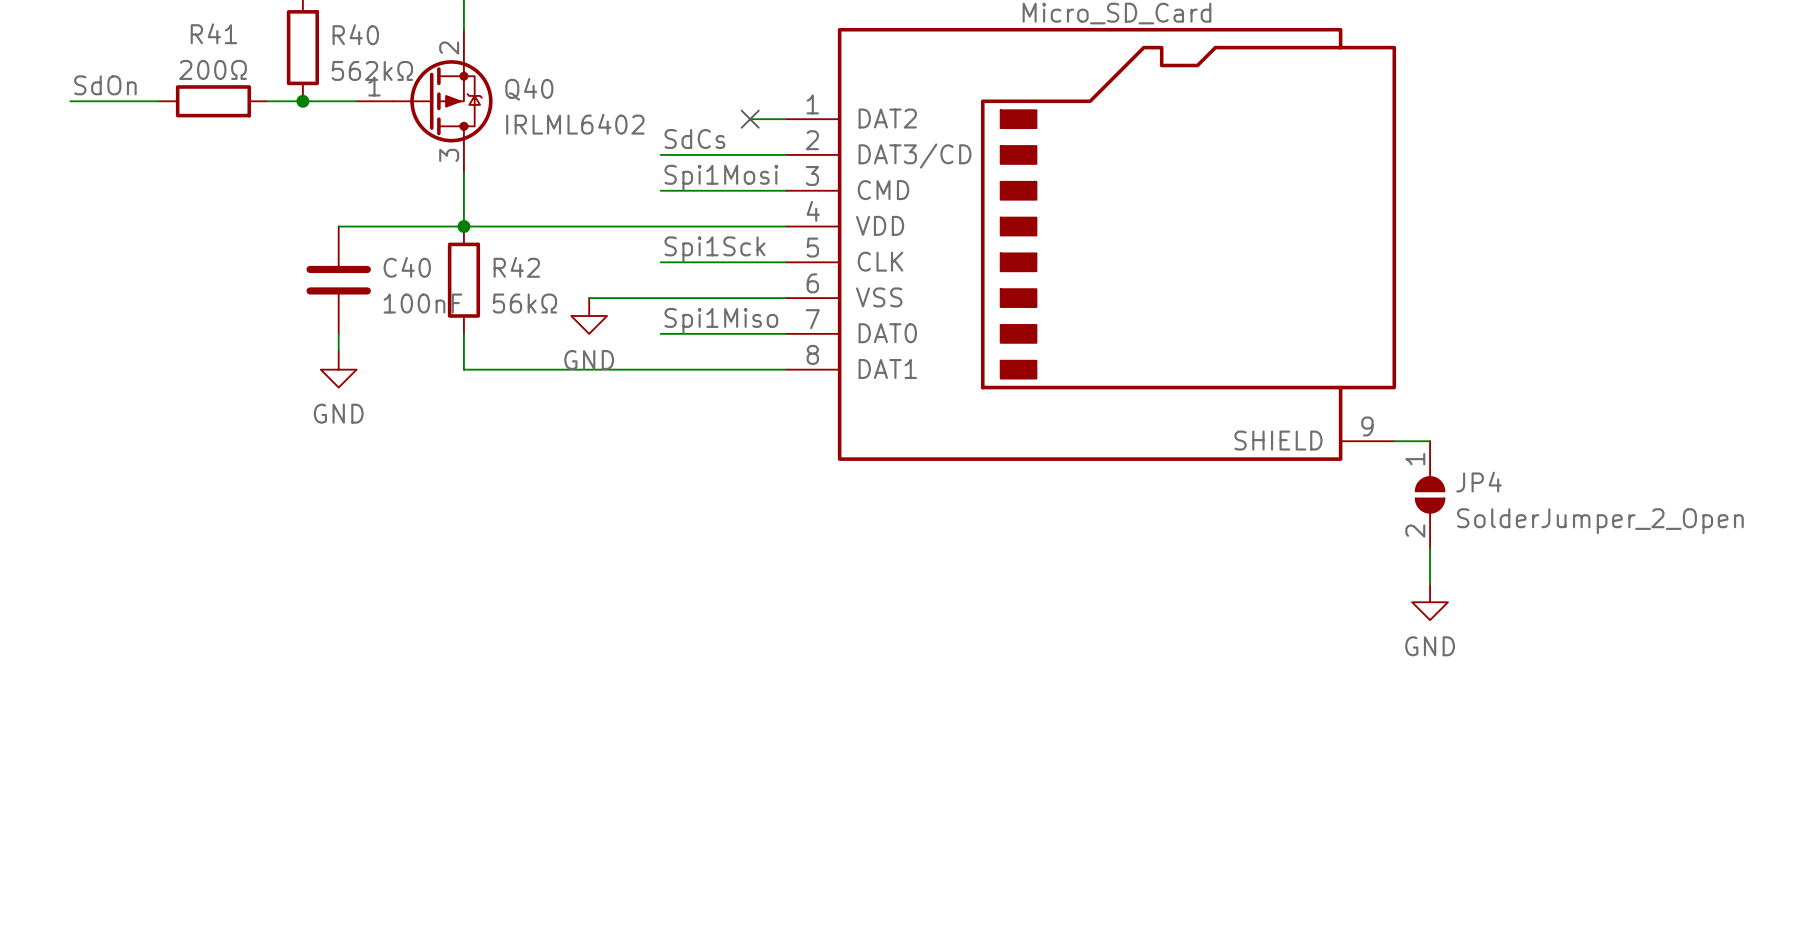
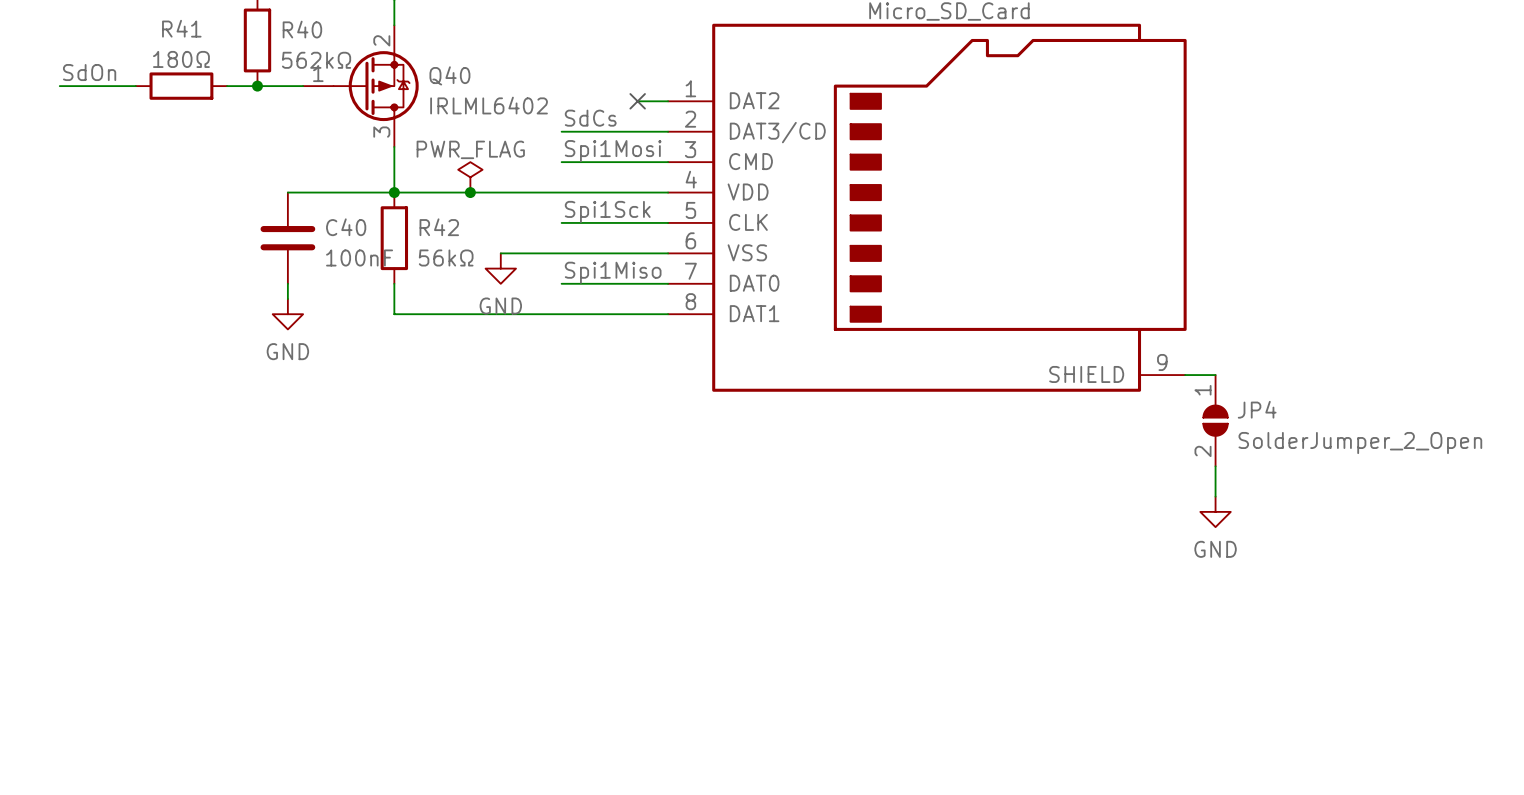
R41 value: 200Ω (213, 69) -> 180Ω (181, 59)
power symbol: none -> PWR_FLAG (470, 177)
junction: none -> (470, 192)

